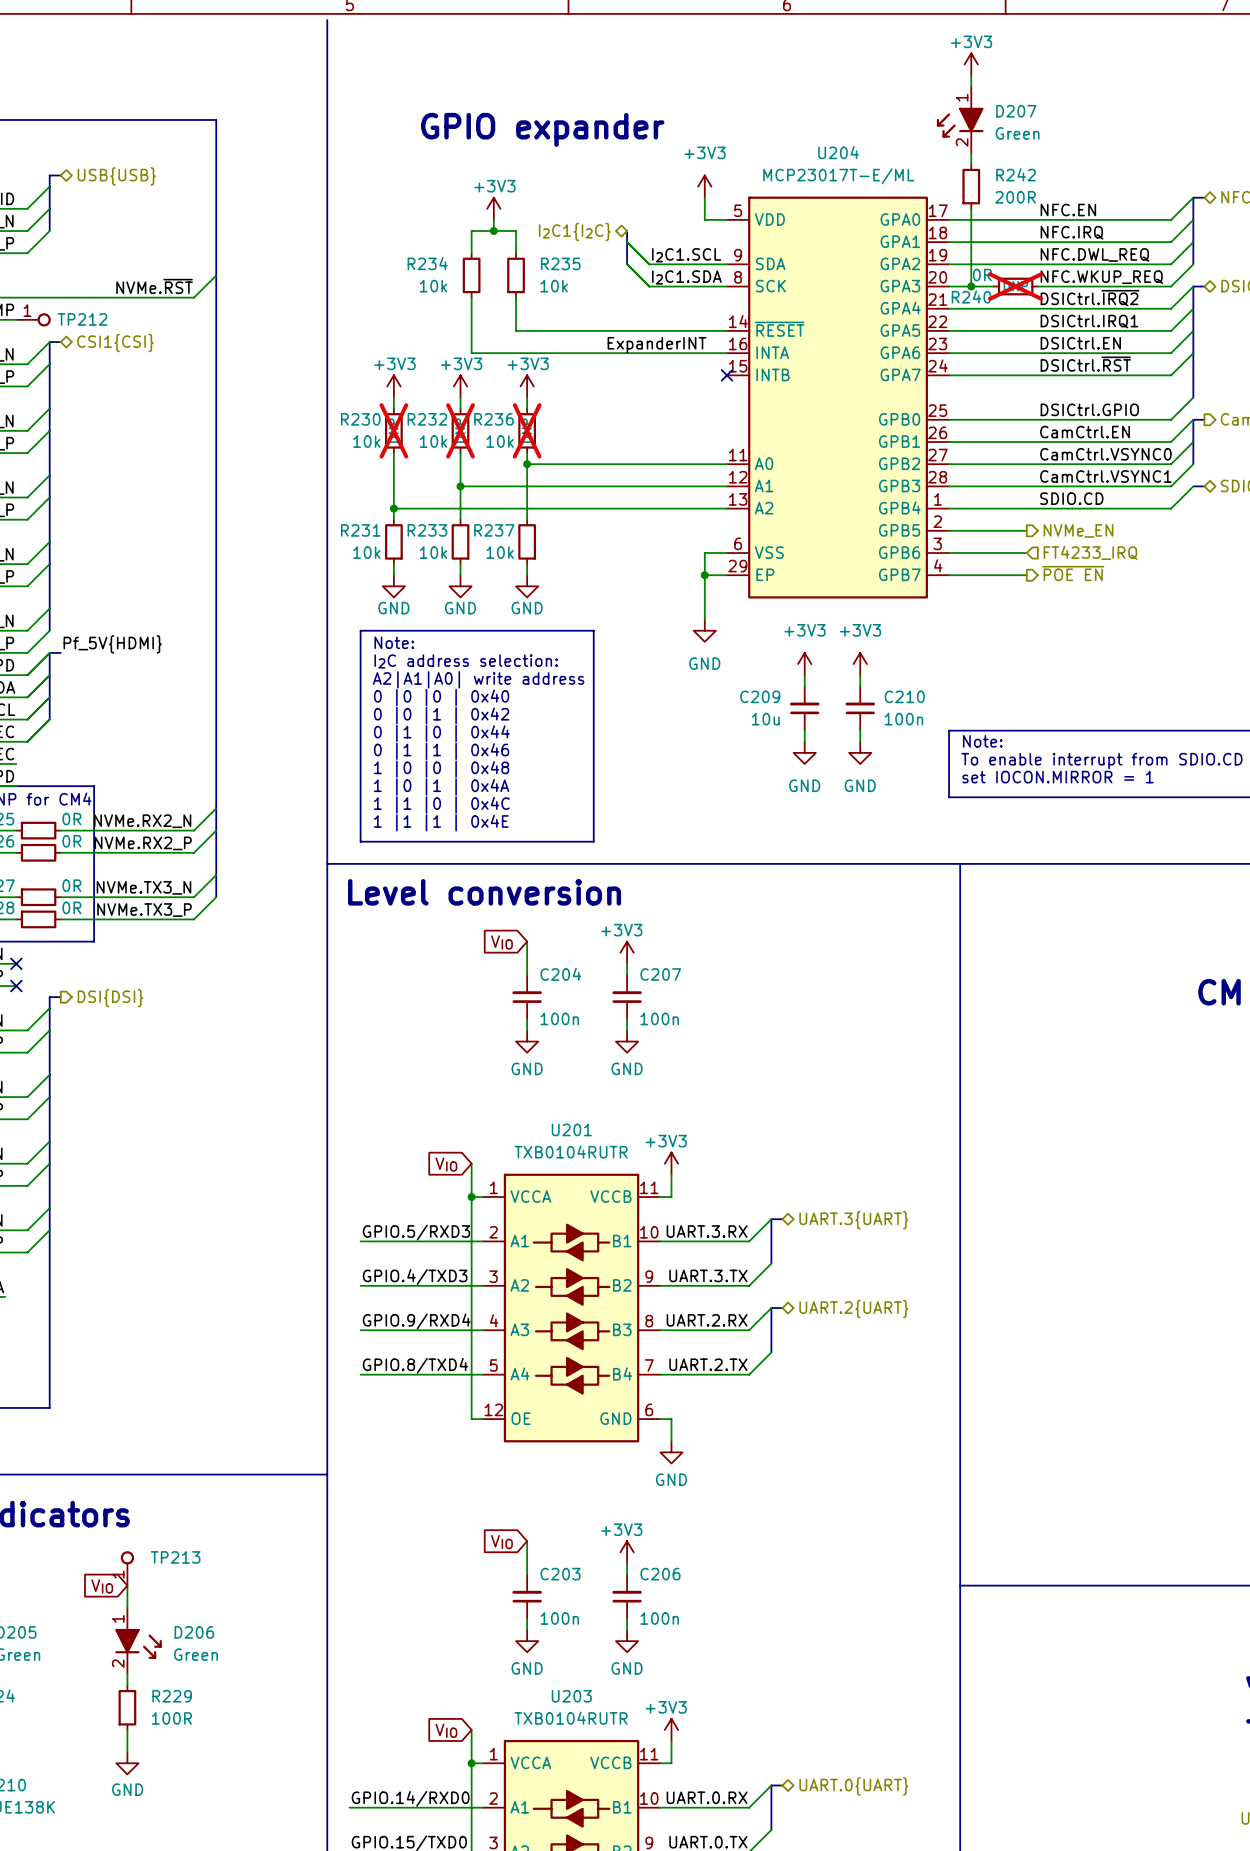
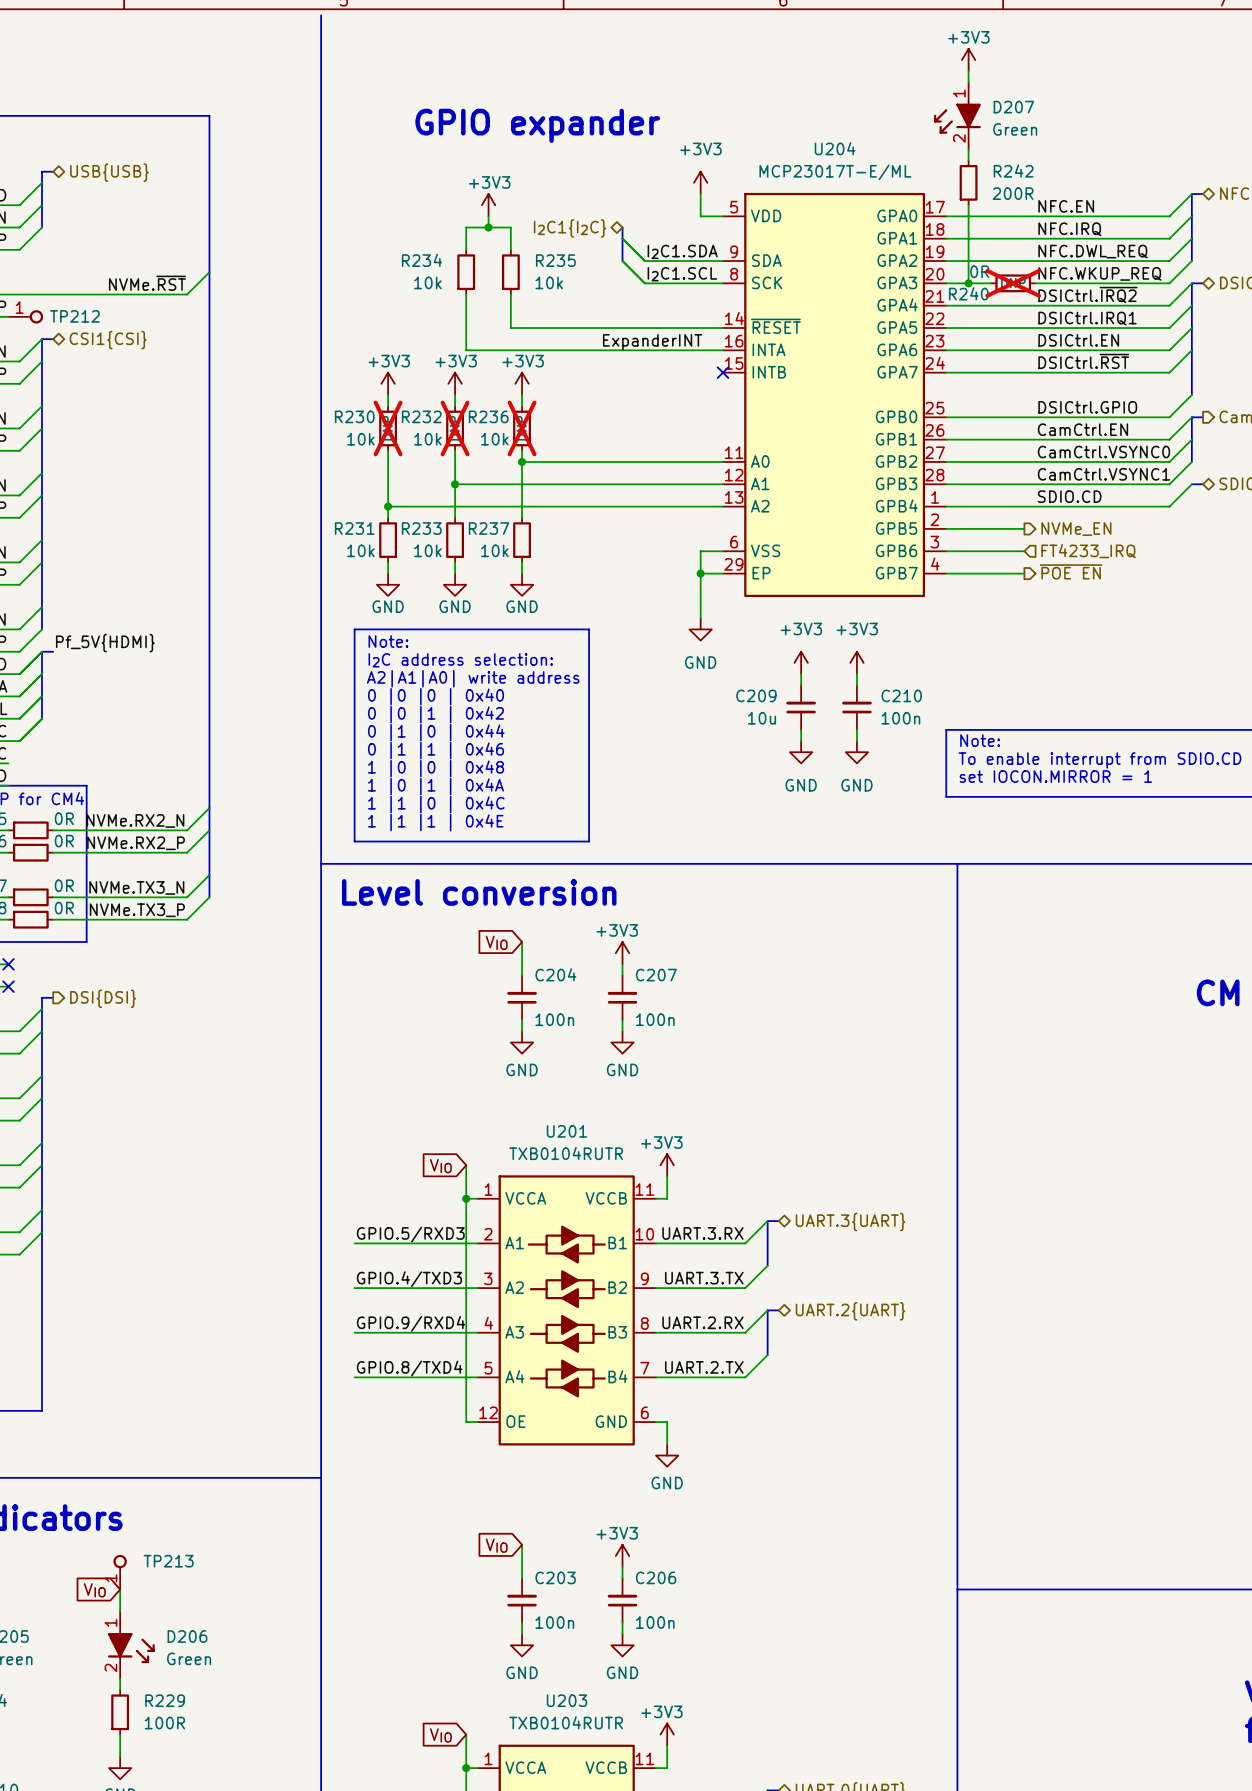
label: I2C1.SCL (686, 255) -> I2C1.SDA (682, 251)
label: I2C1.SDA (686, 277) -> I2C1.SCL (682, 274)

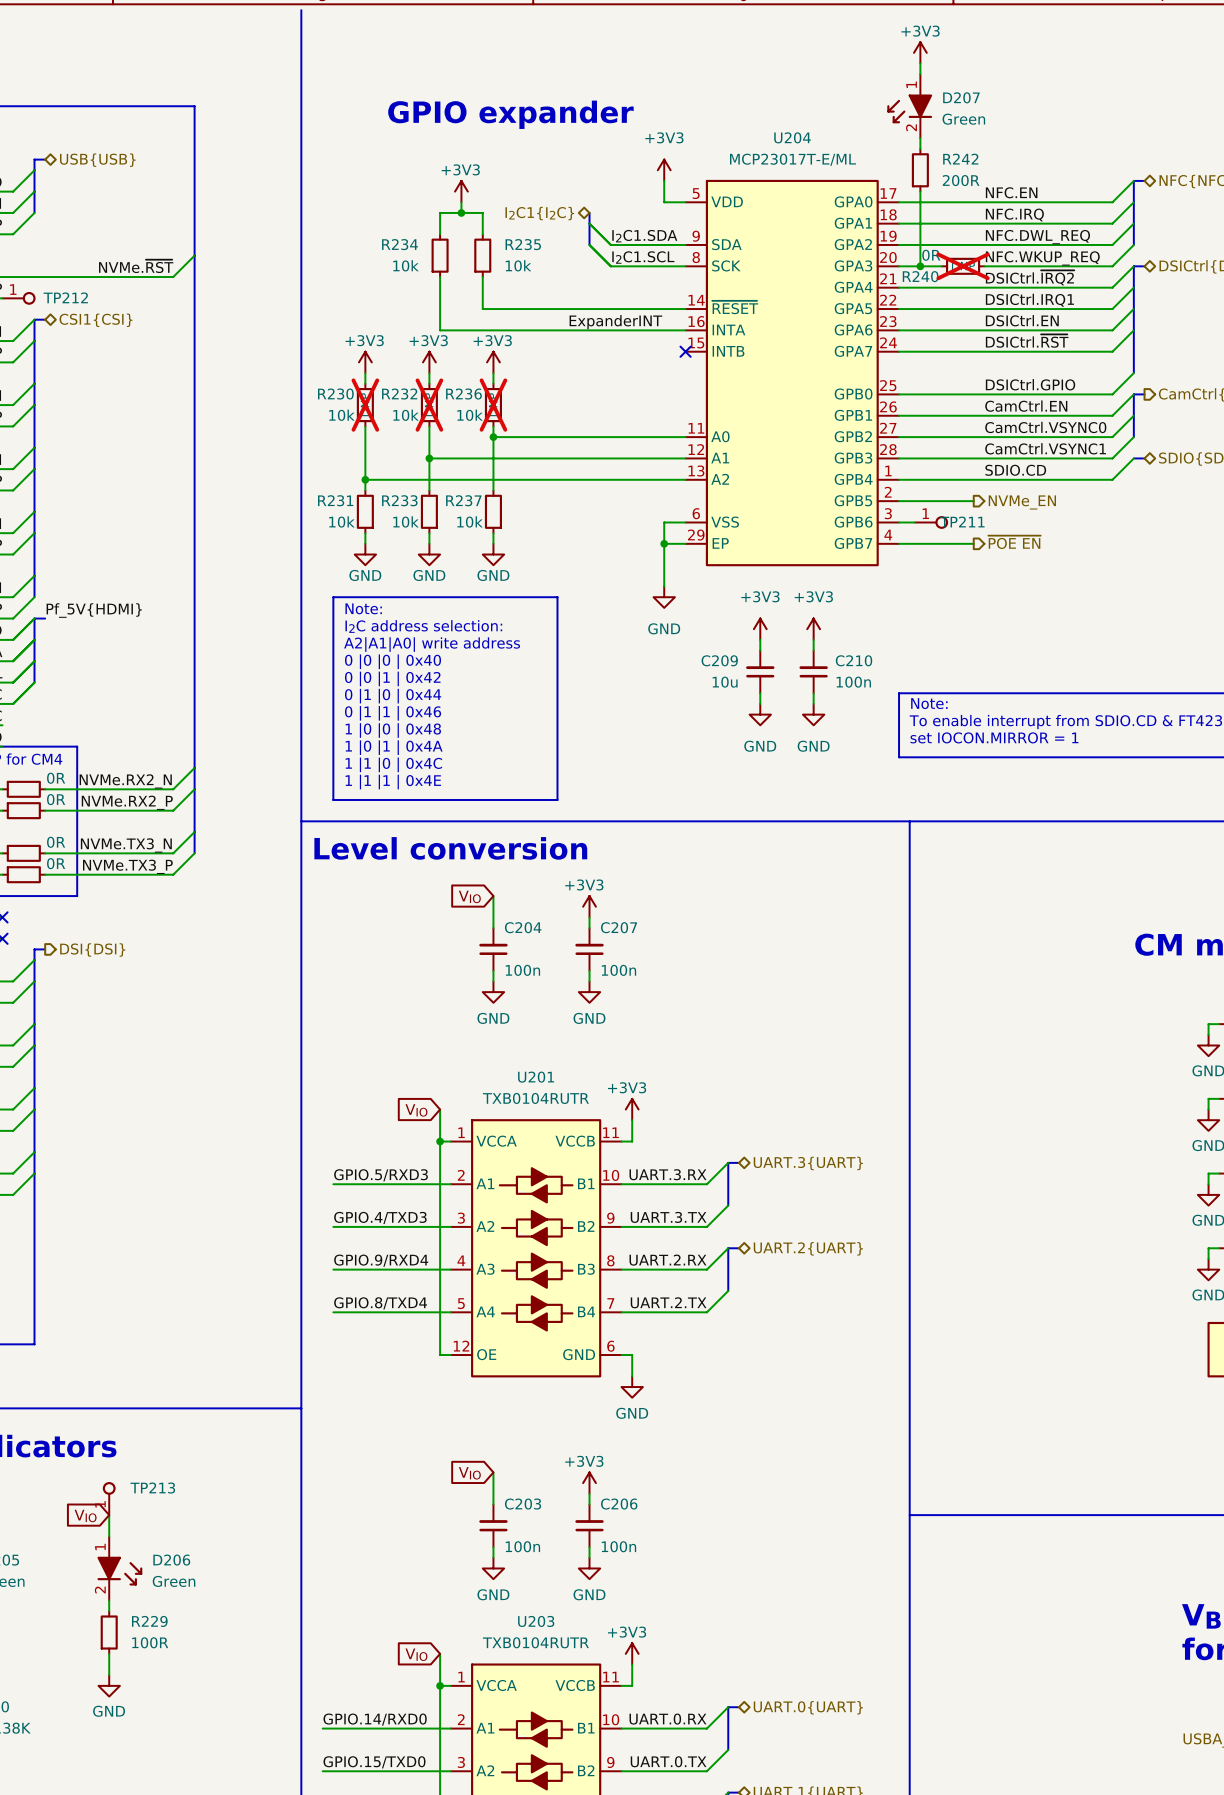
TP211: none -> (931, 522)
hierarchical label: FT4233_IRQ (1088, 551) -> none

